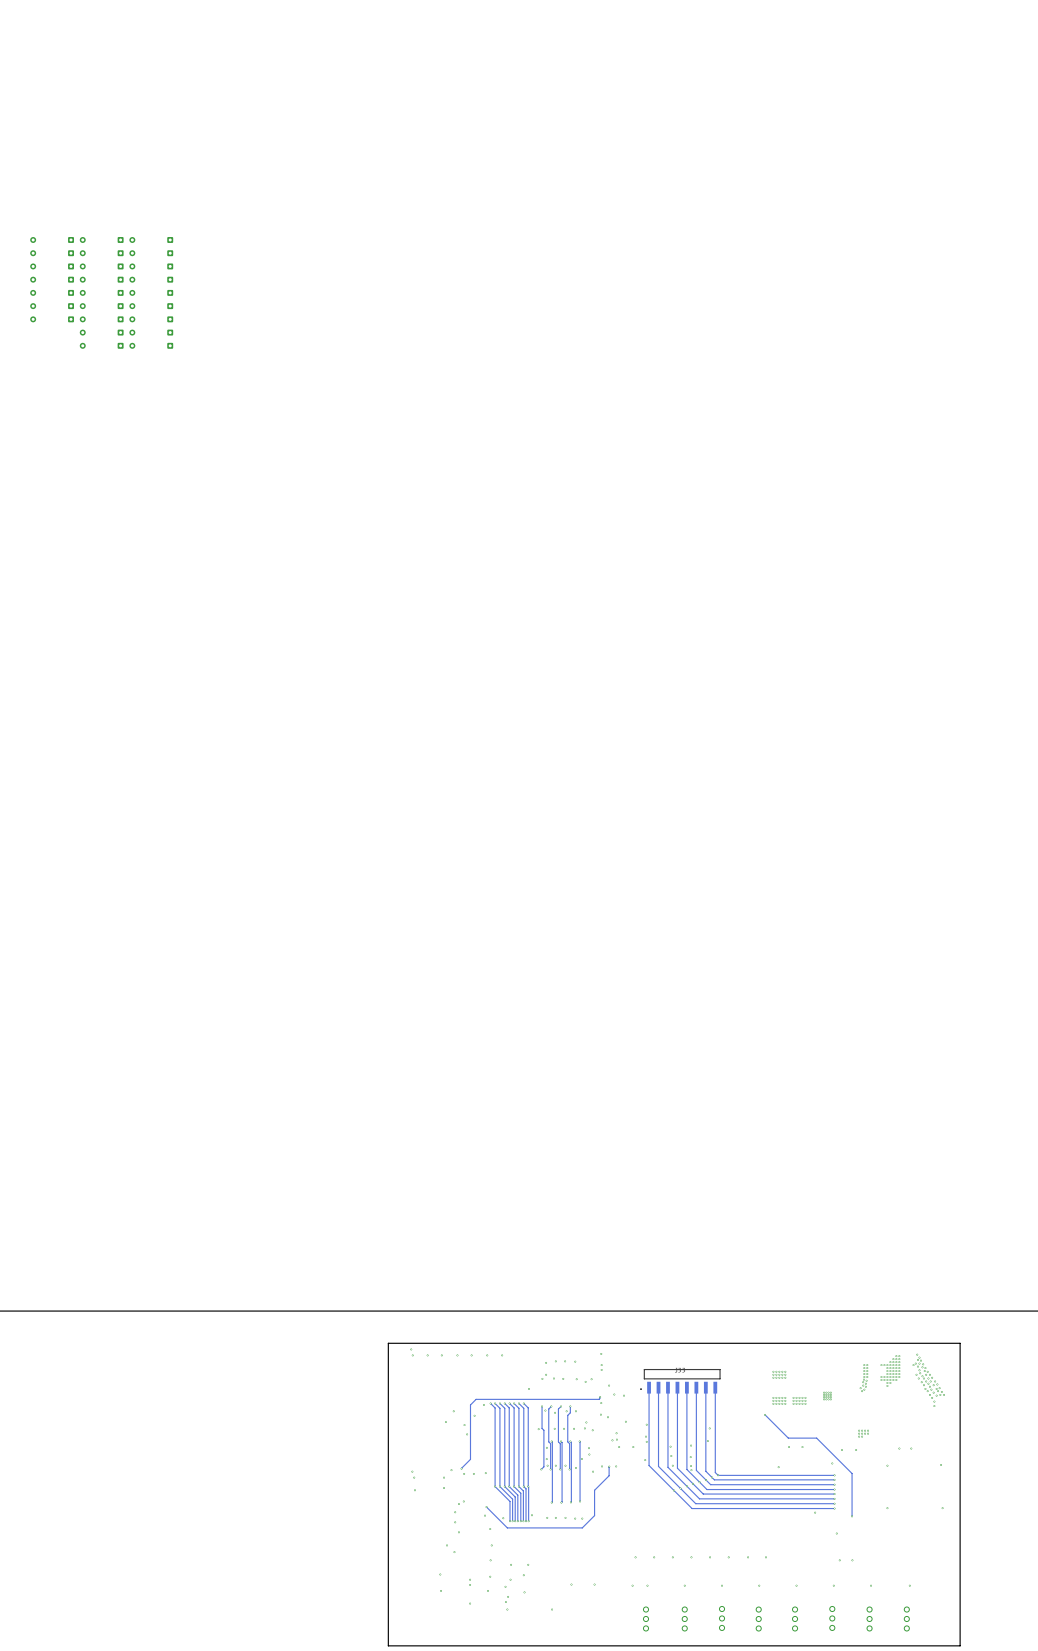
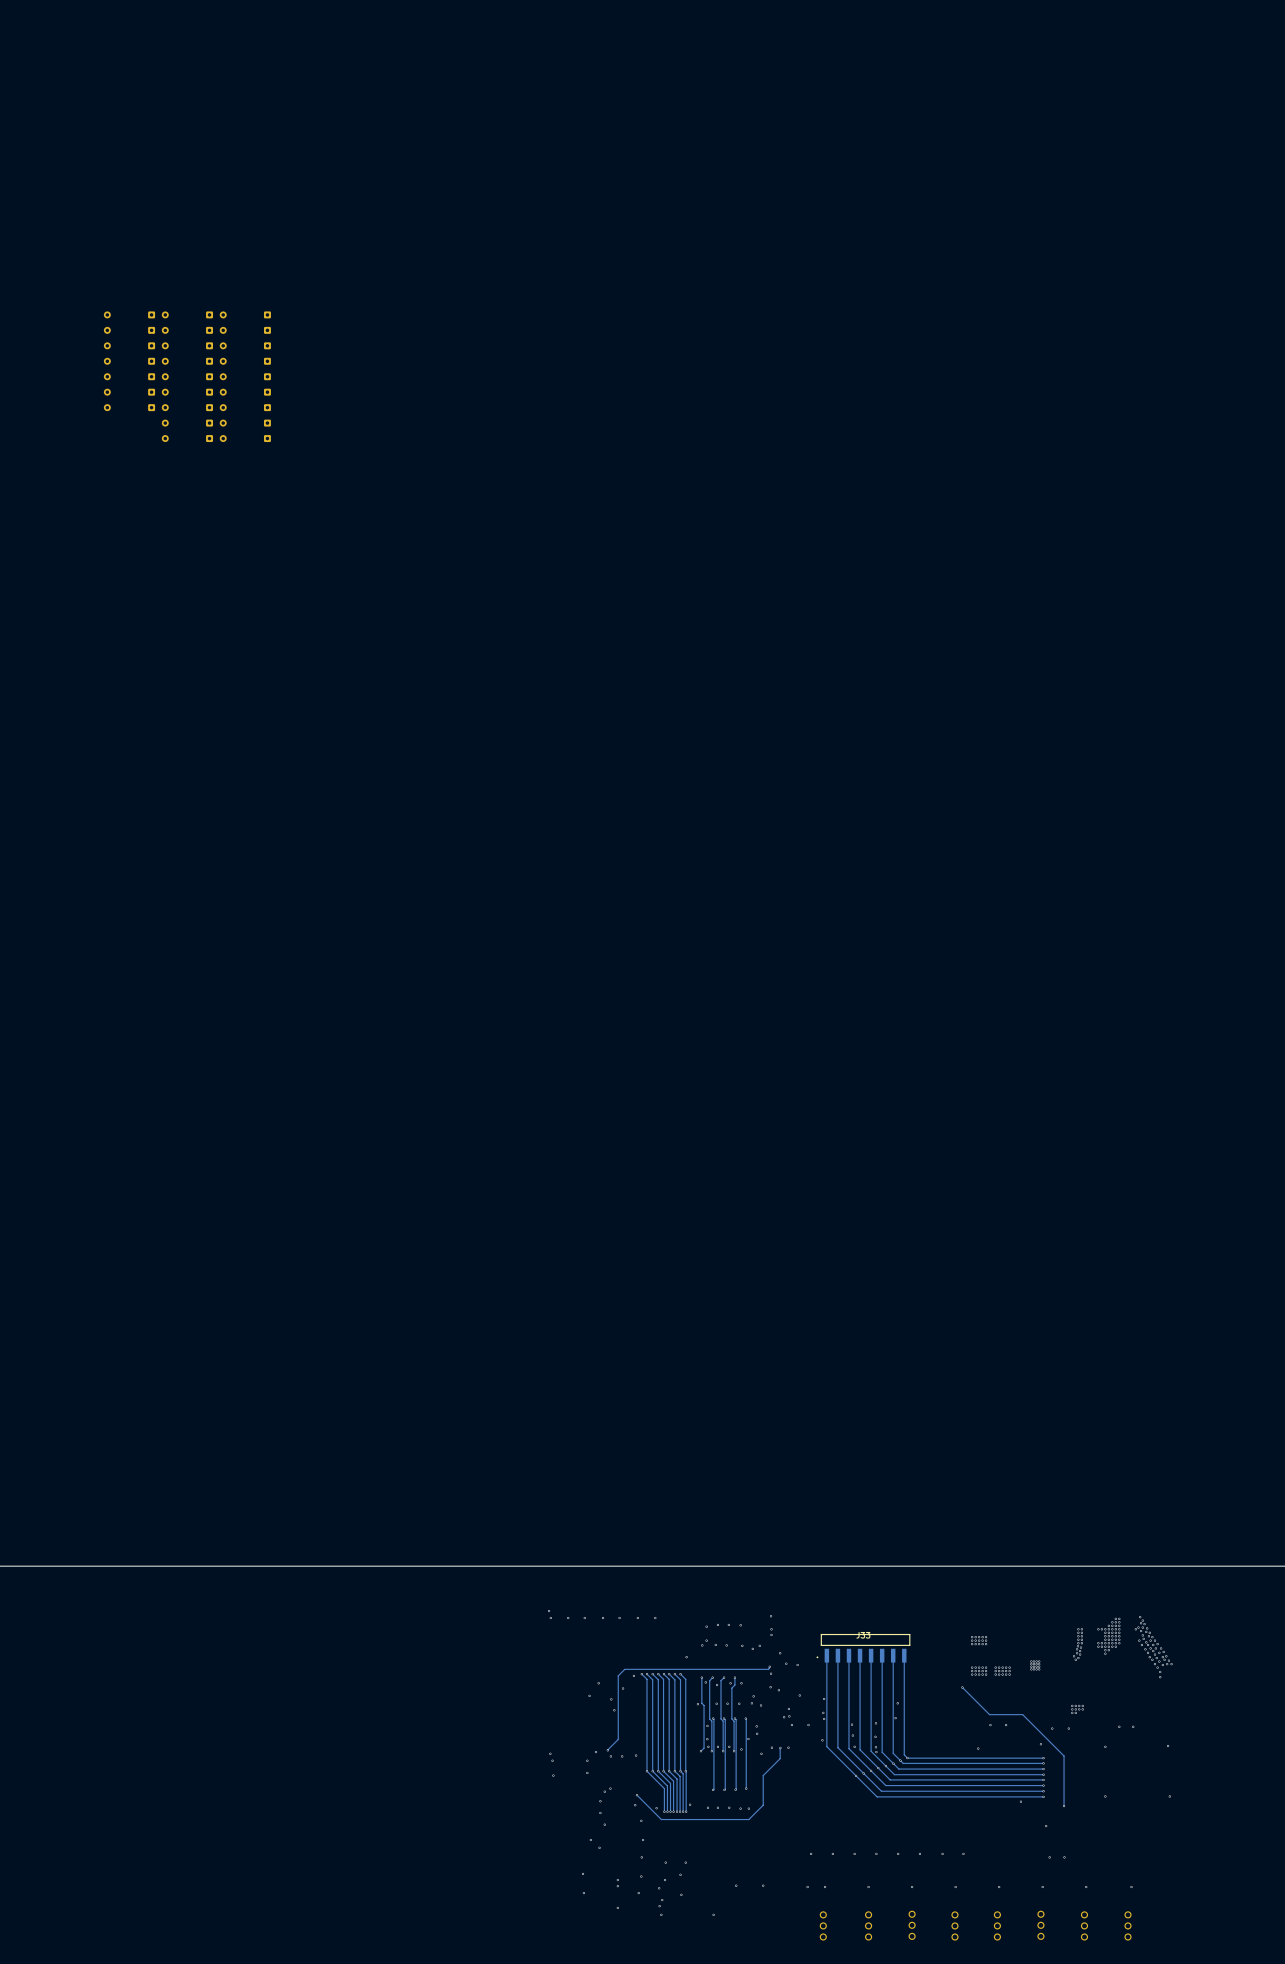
board edge: (960, 1343) (388, 1343) (388, 1645) (960, 1645) (960, 1343) -> none

